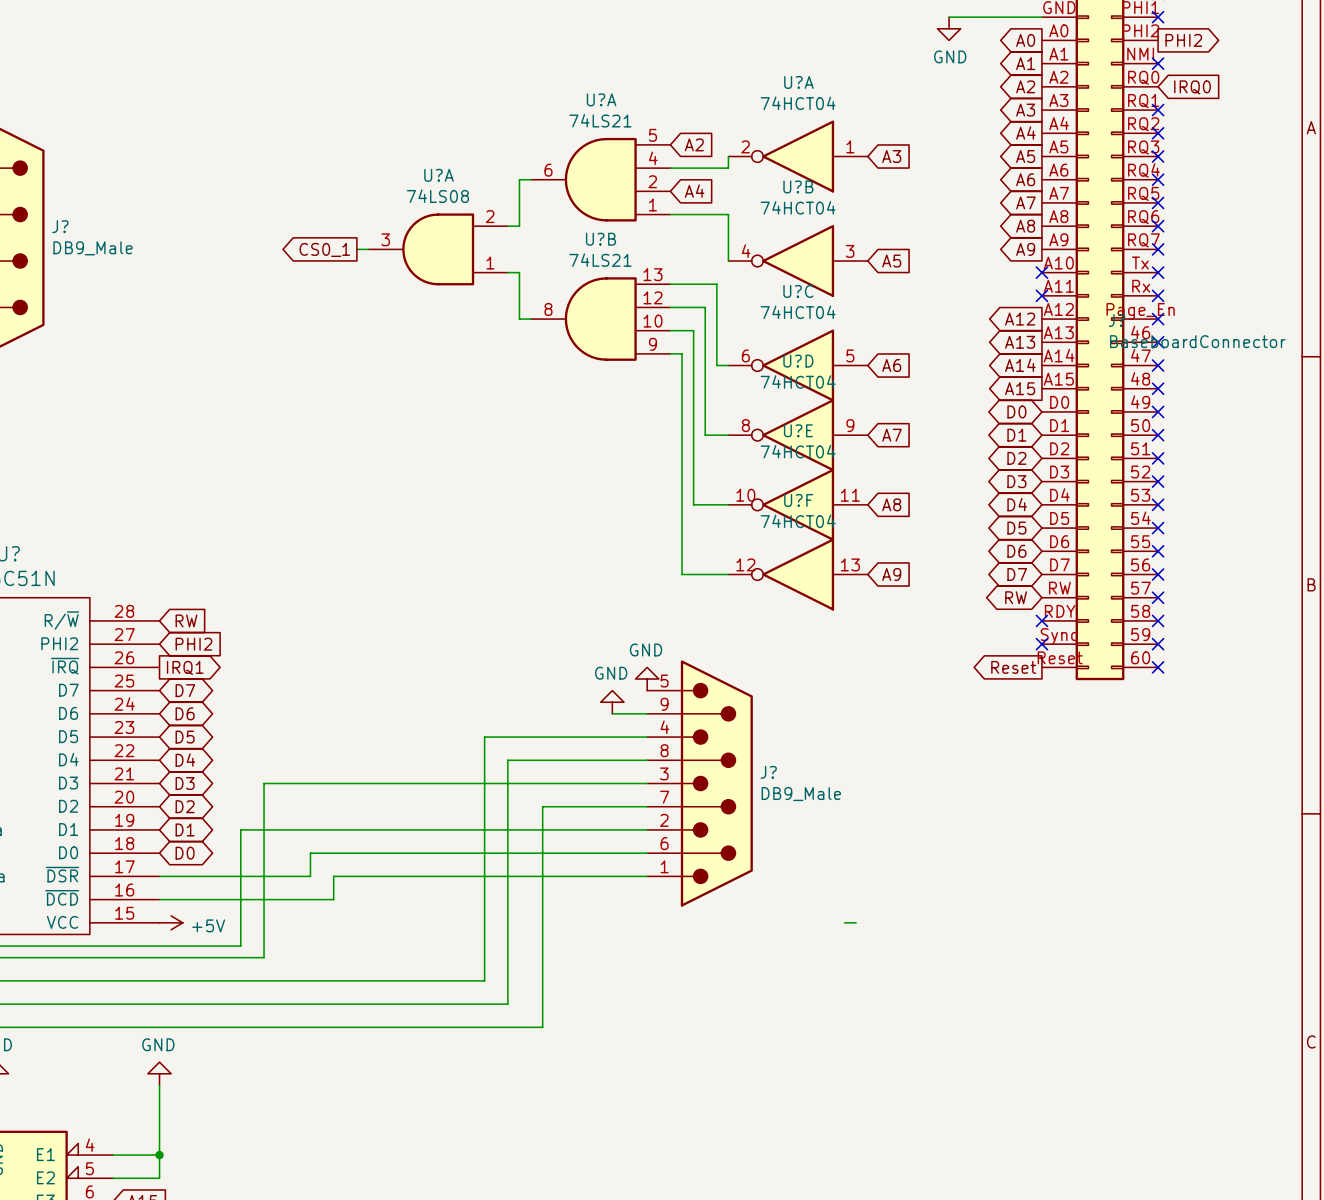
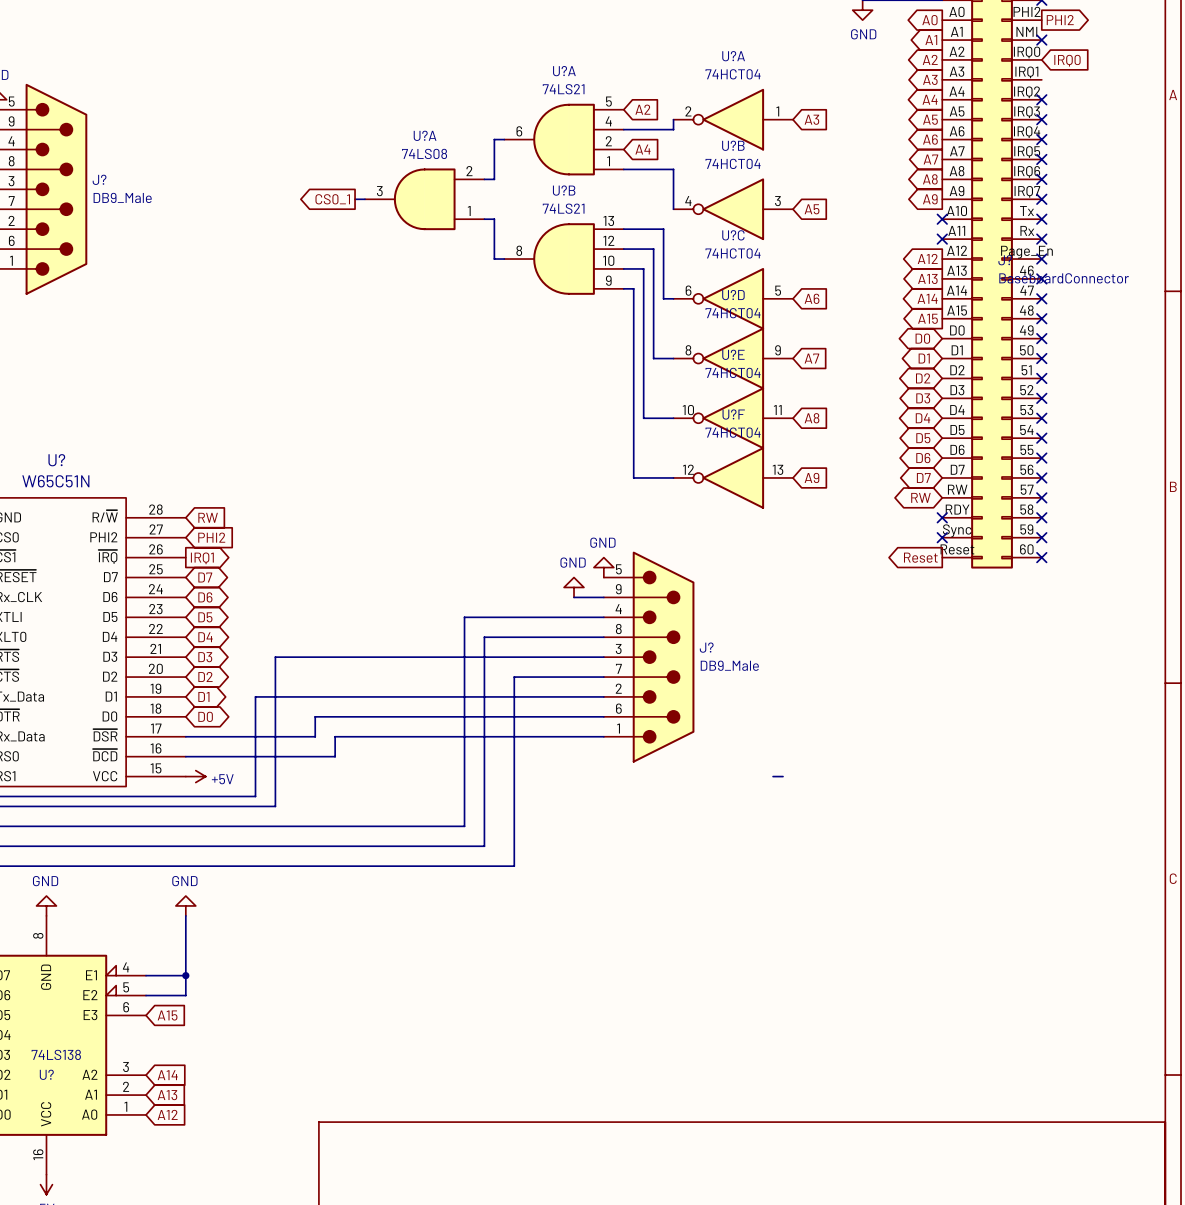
no-connect mark: (1158, 110) -> none

